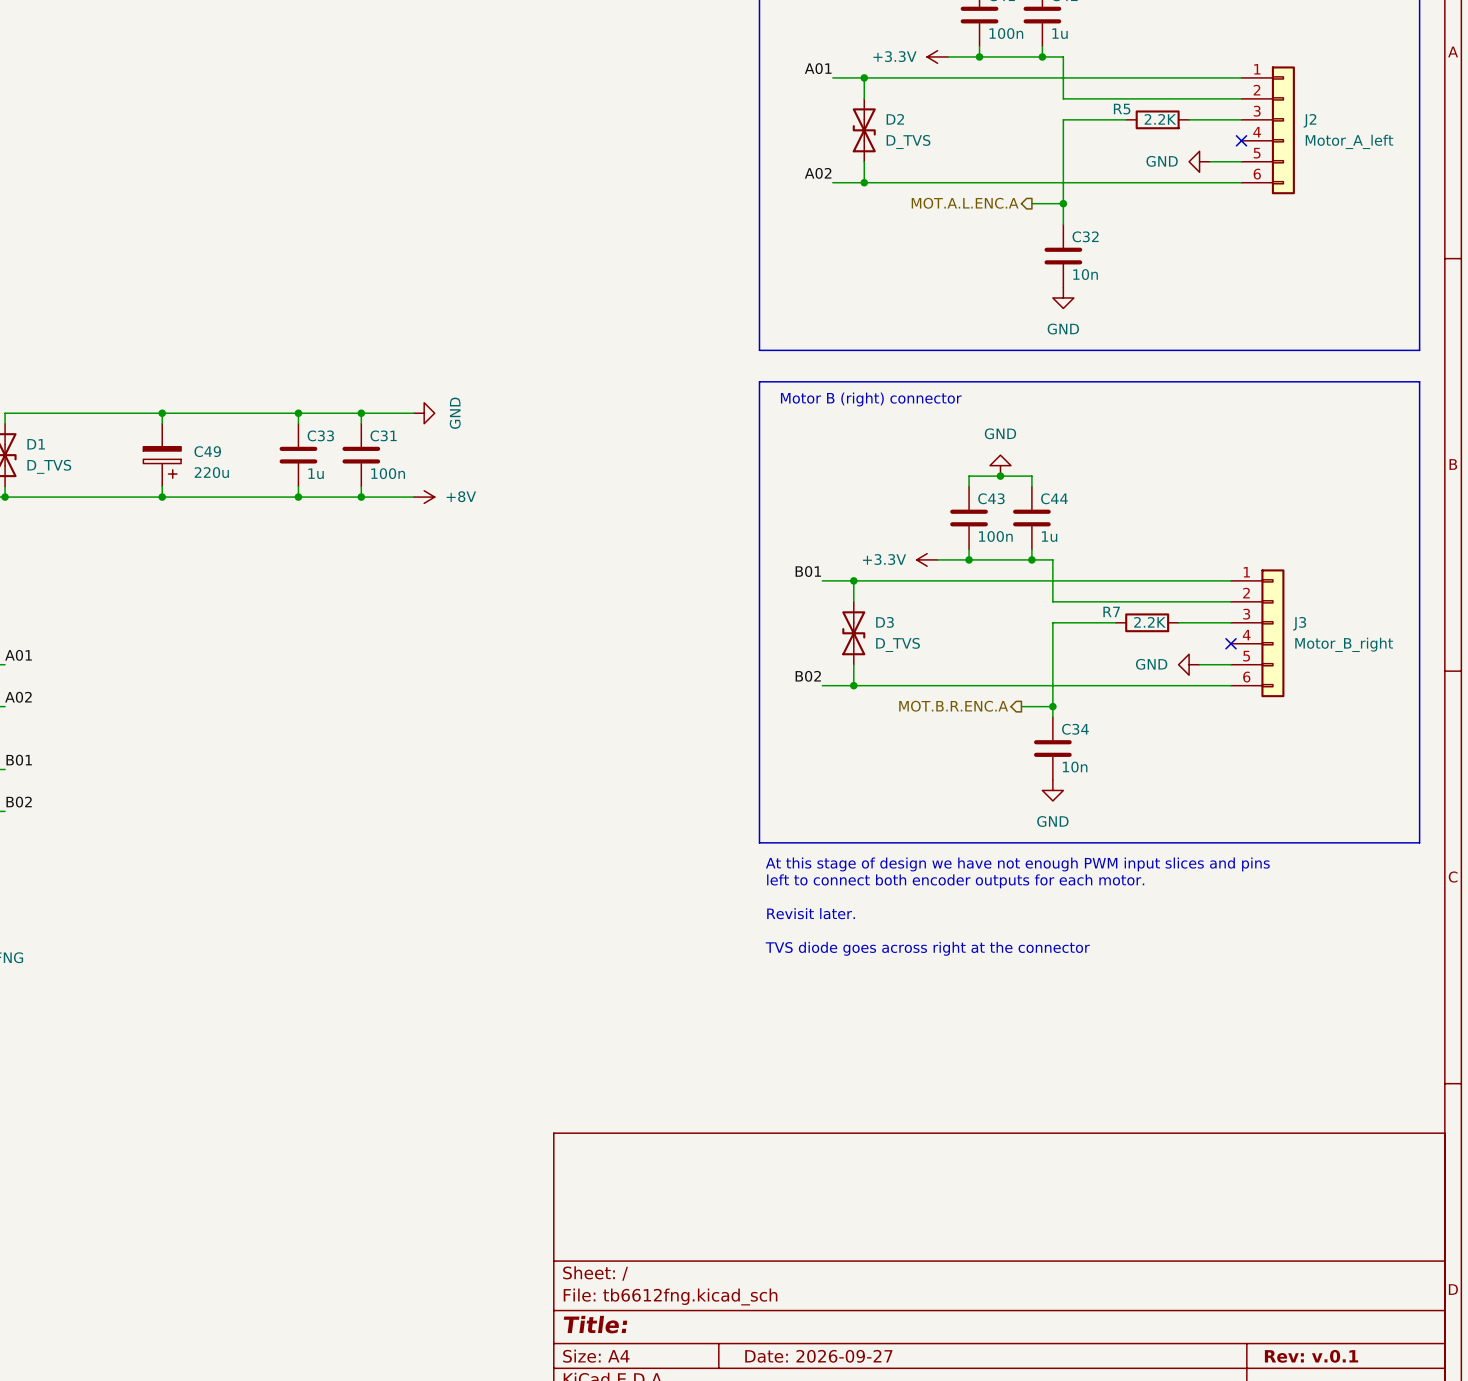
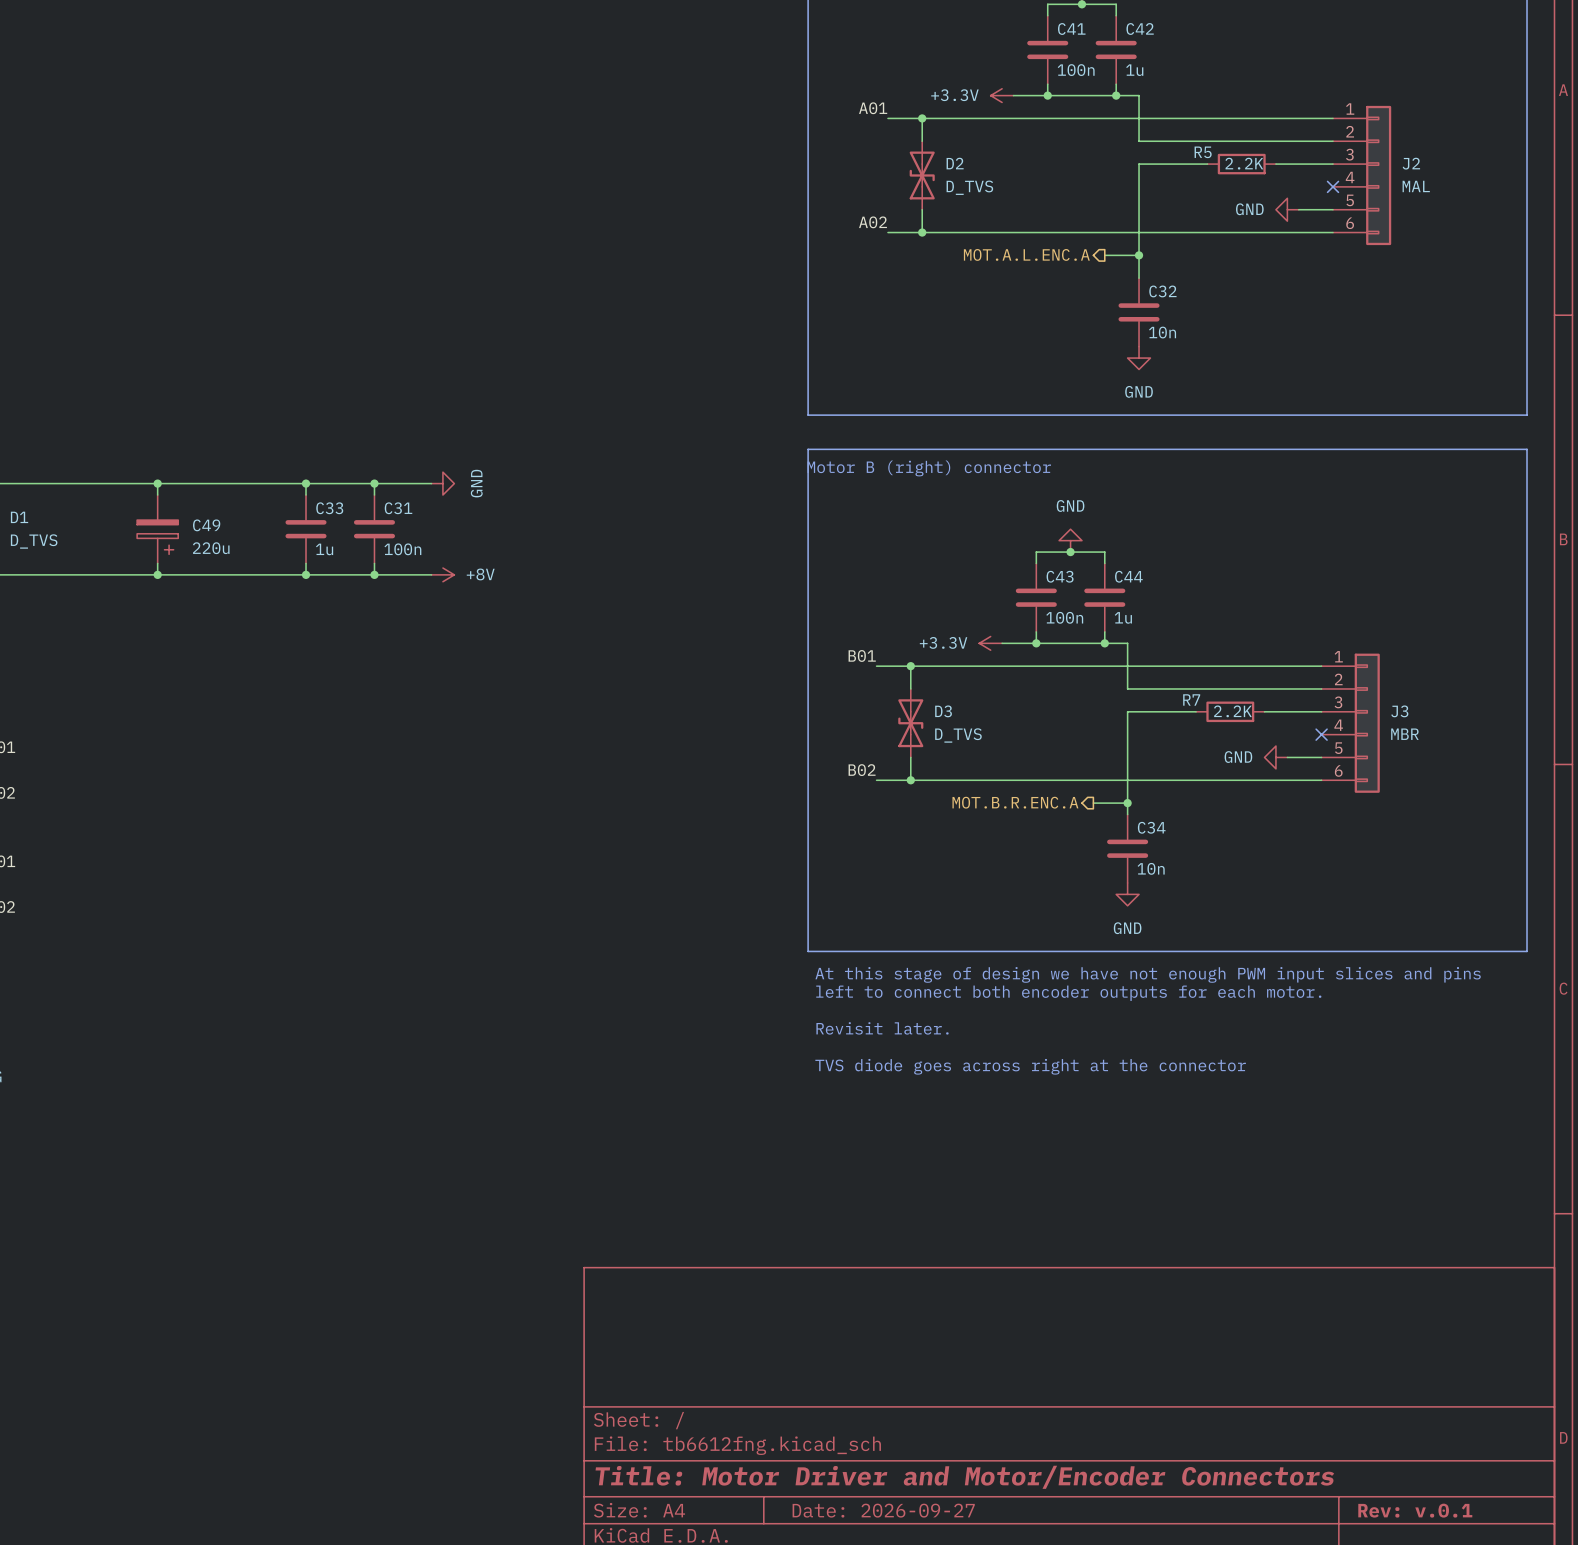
J2 value: Motor_A_left (1349, 141) -> MAL (1416, 186)
J3 value: Motor_B_right (1344, 644) -> MBR (1404, 734)
title block: Title: (595, 1324) -> Title: Motor Driver and Motor/Encoder Connectors (964, 1477)

